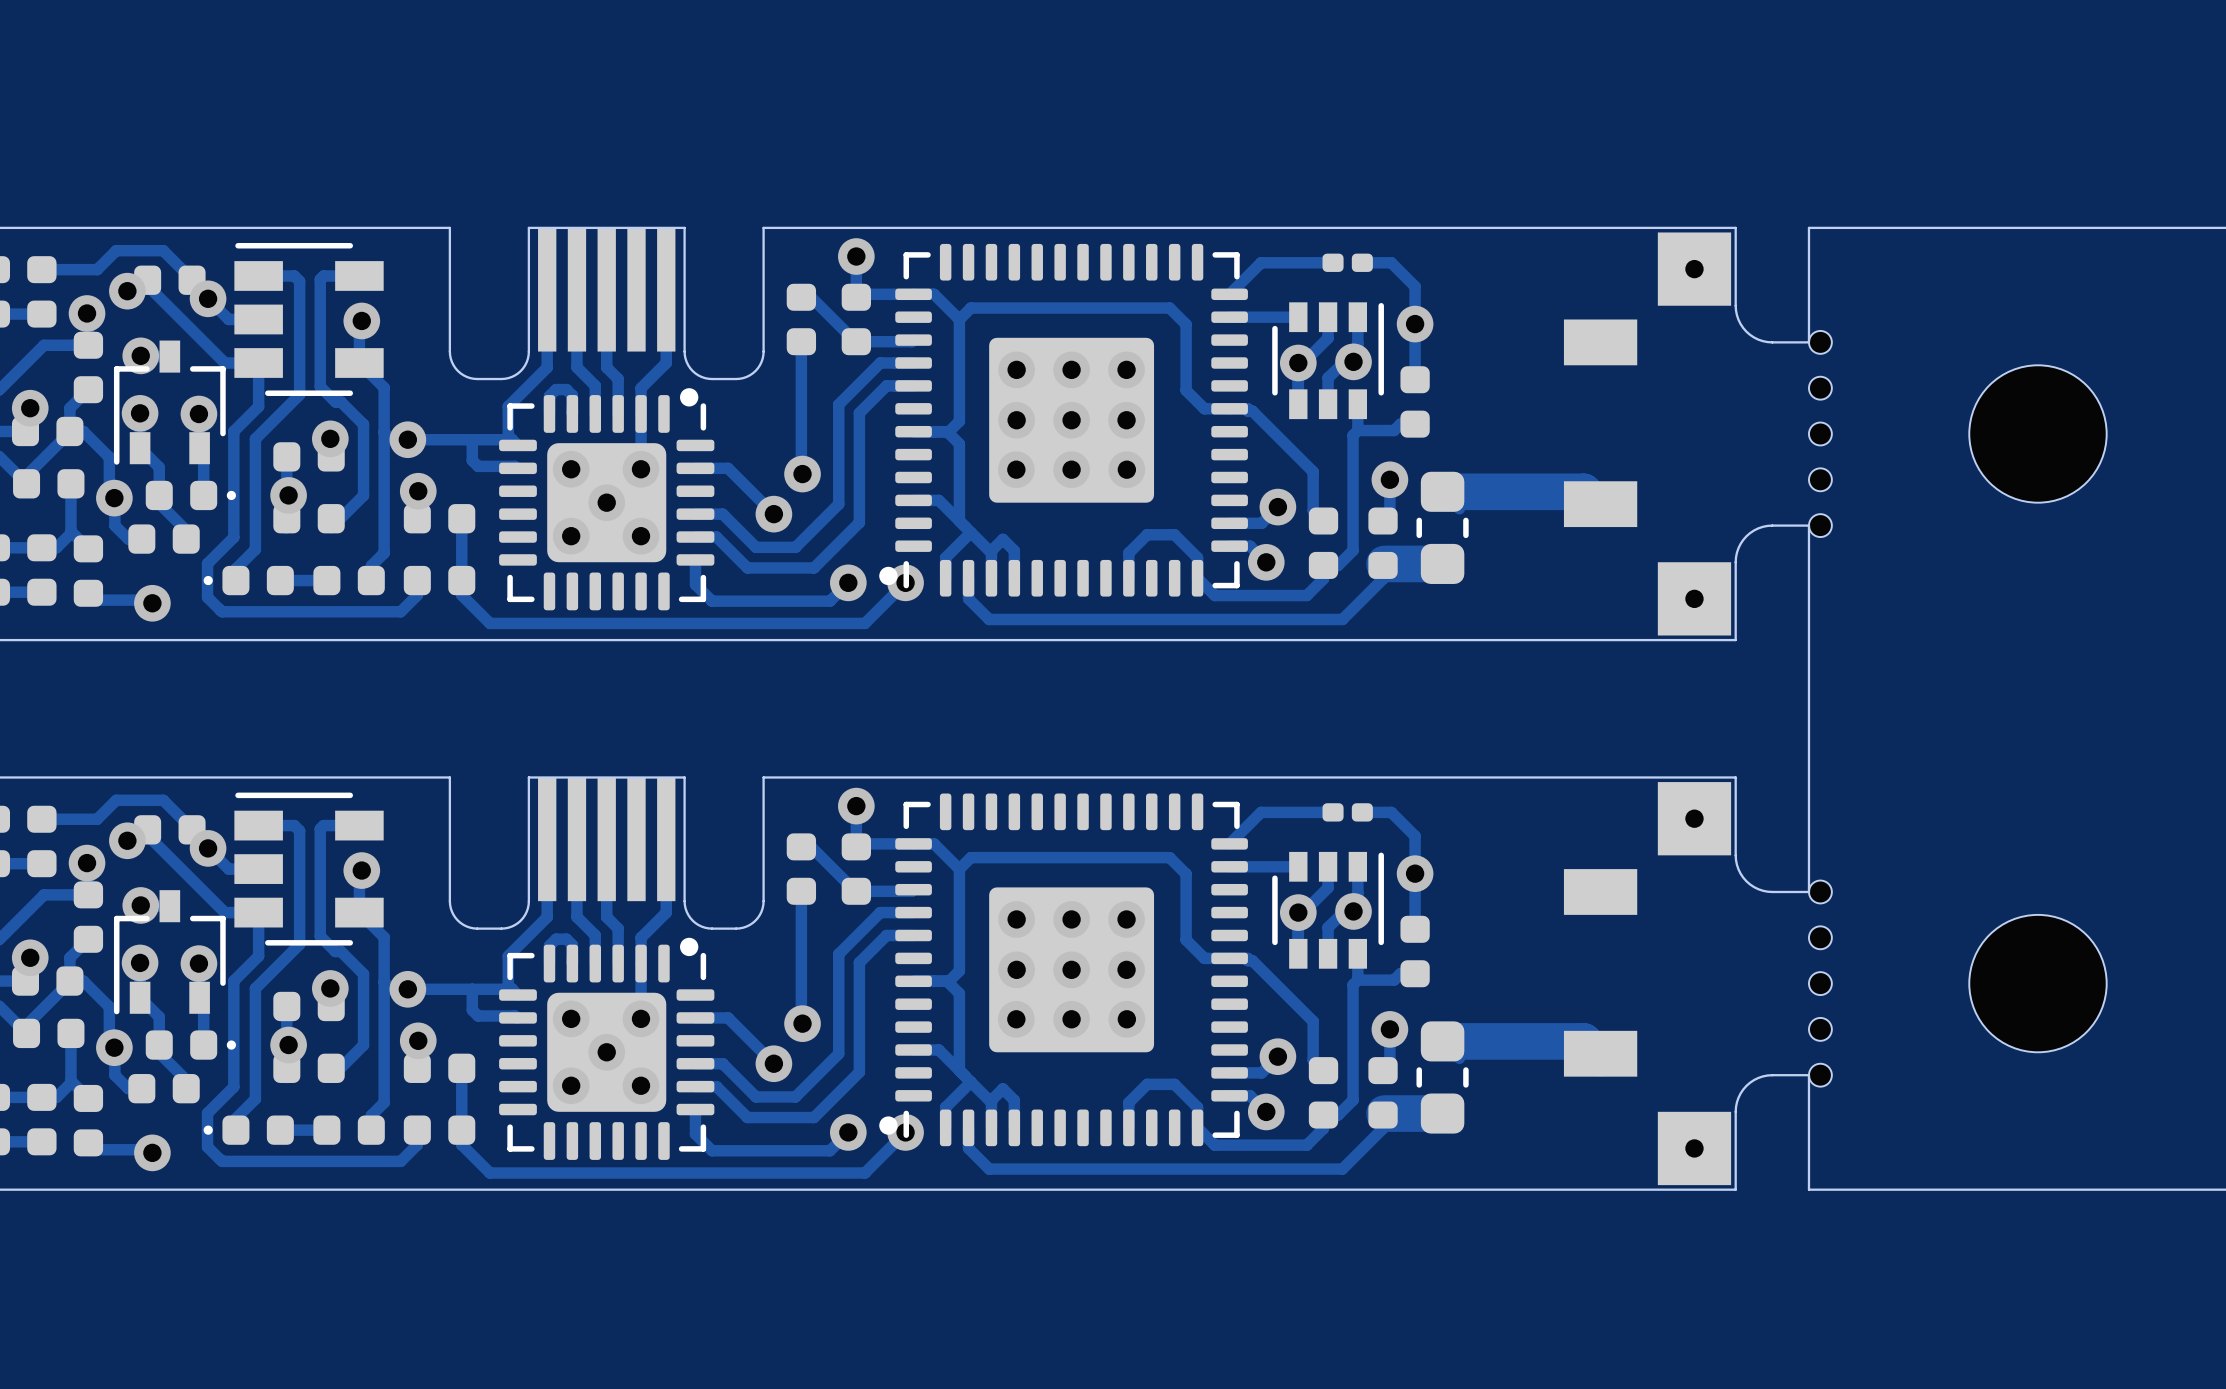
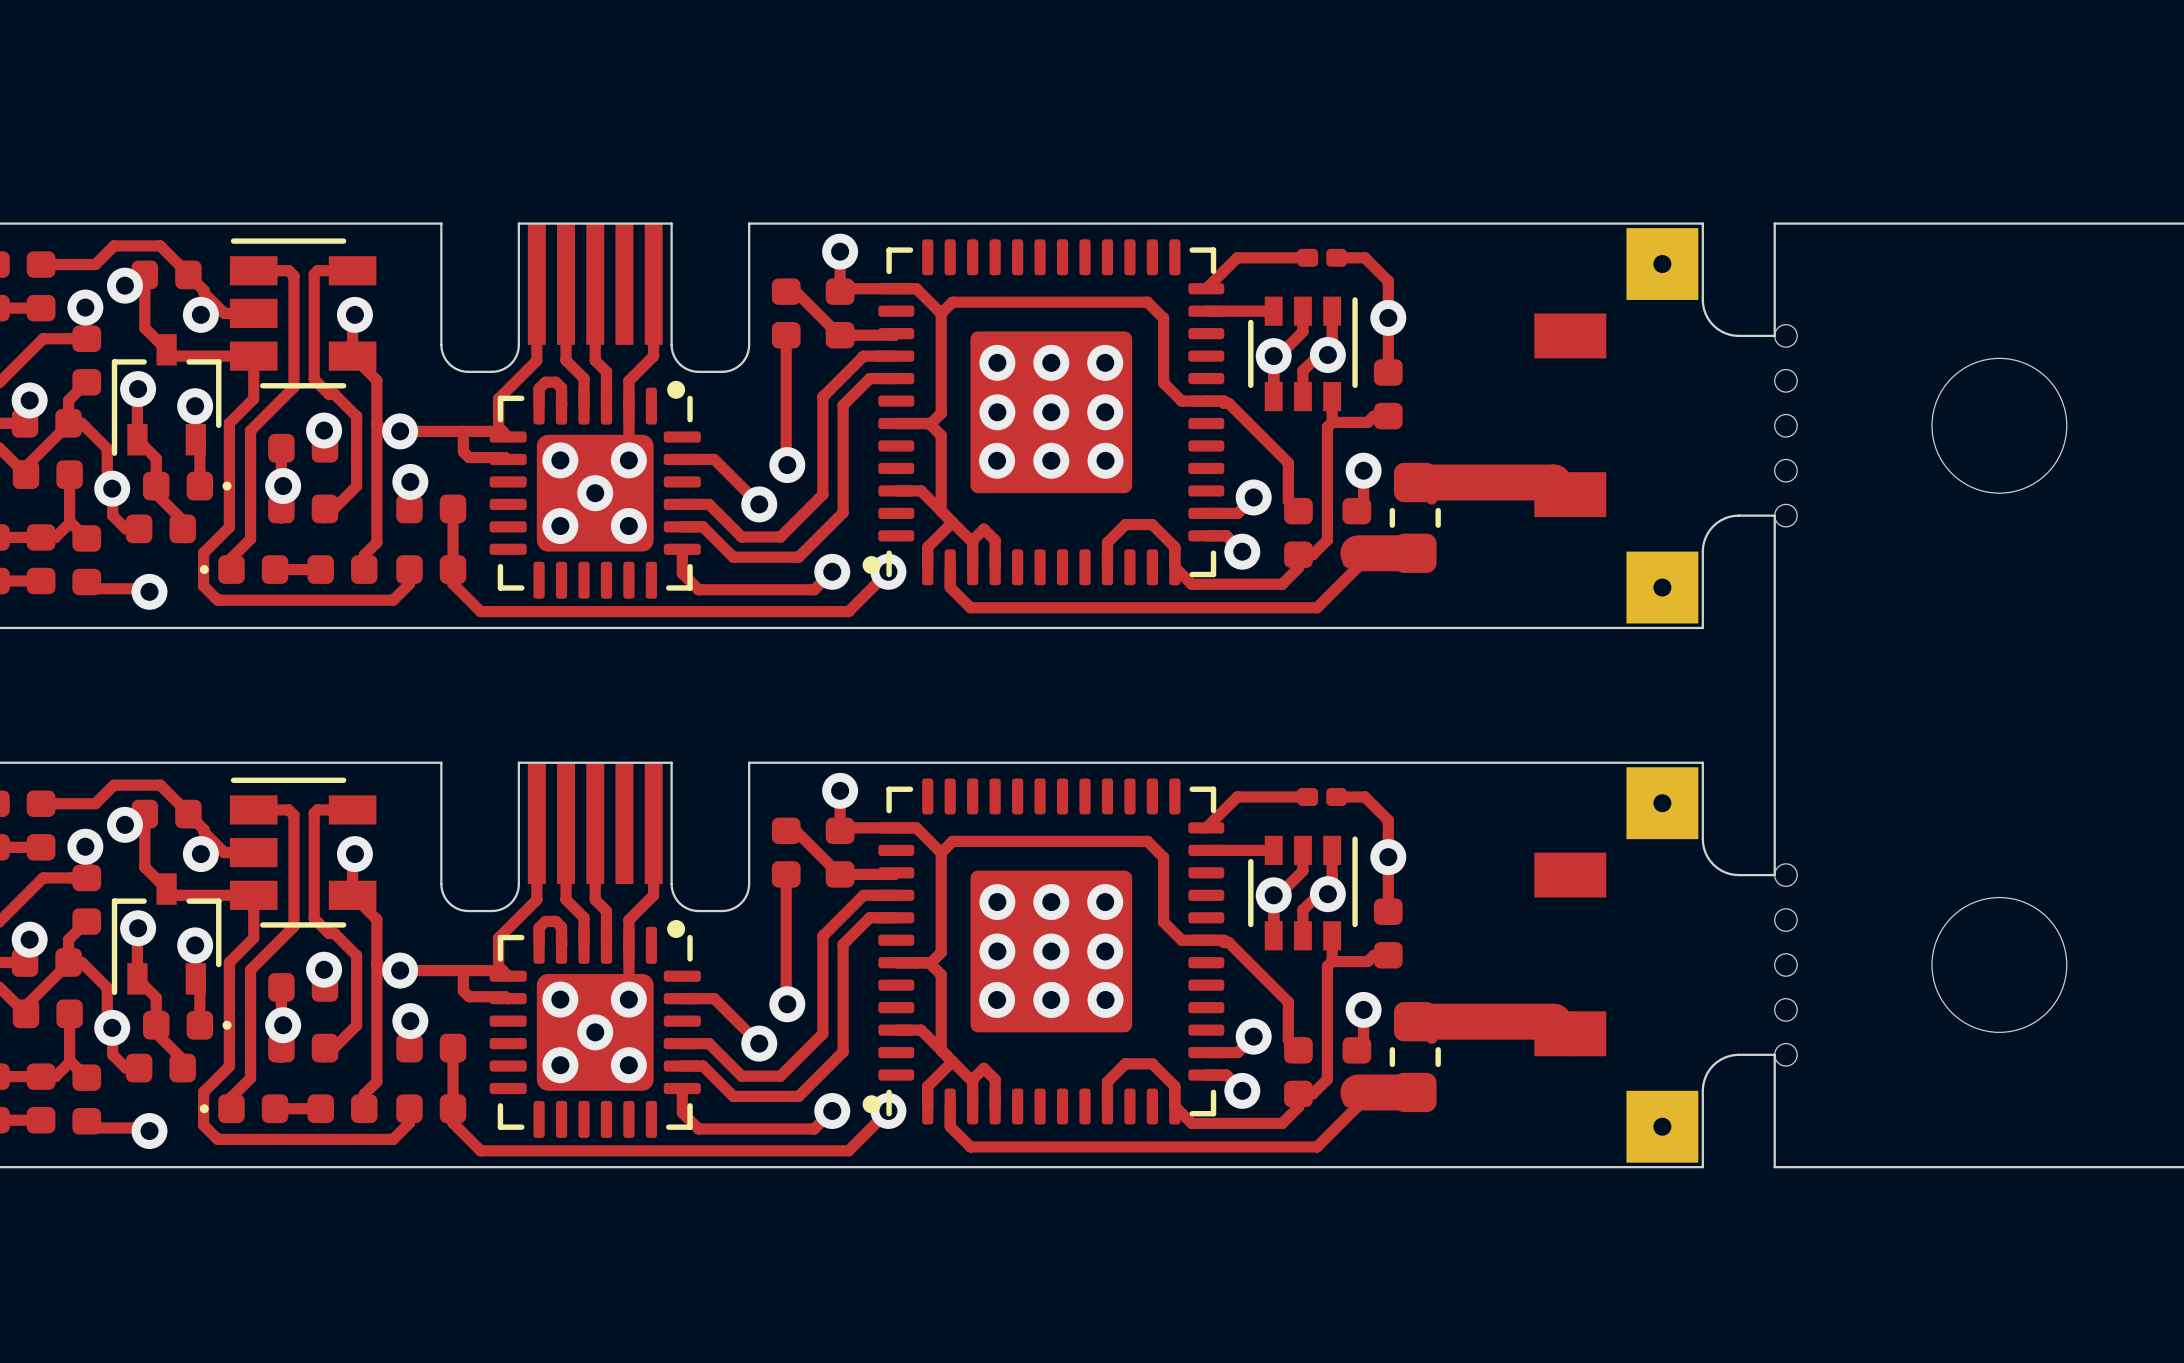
track: (147, 285) (224, 363) -> (144, 280) (144, 328) (172, 356) (220, 356)
via position: (208, 298) -> (200, 314)
via: (140, 355) -> none
via position: (140, 413) -> (138, 389)
track: (147, 835) (224, 912) -> (144, 819) (144, 867) (172, 895) (220, 895)
via position: (208, 848) -> (200, 854)
via: (140, 905) -> none
via position: (140, 962) -> (138, 928)

